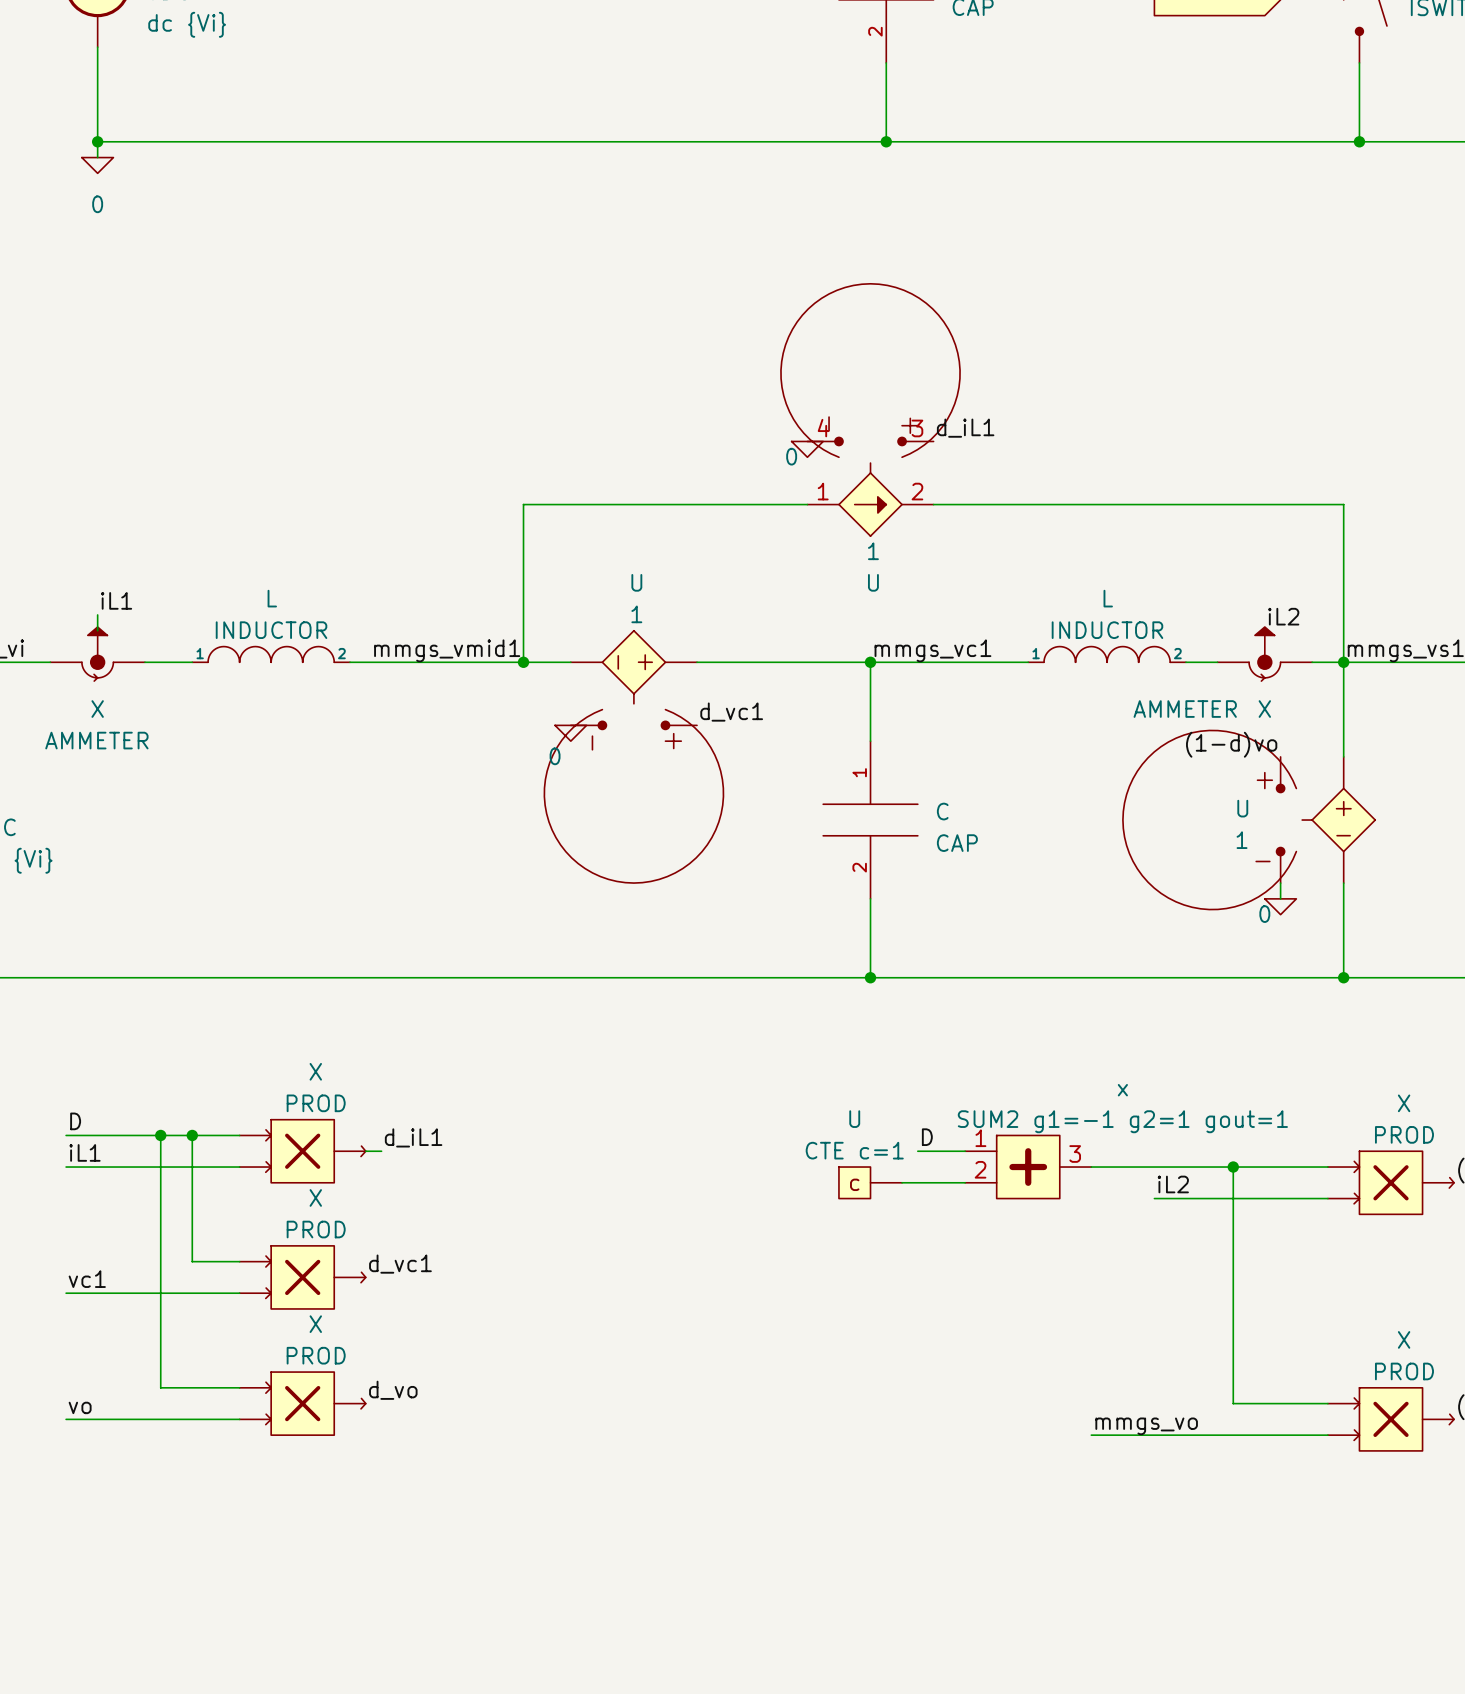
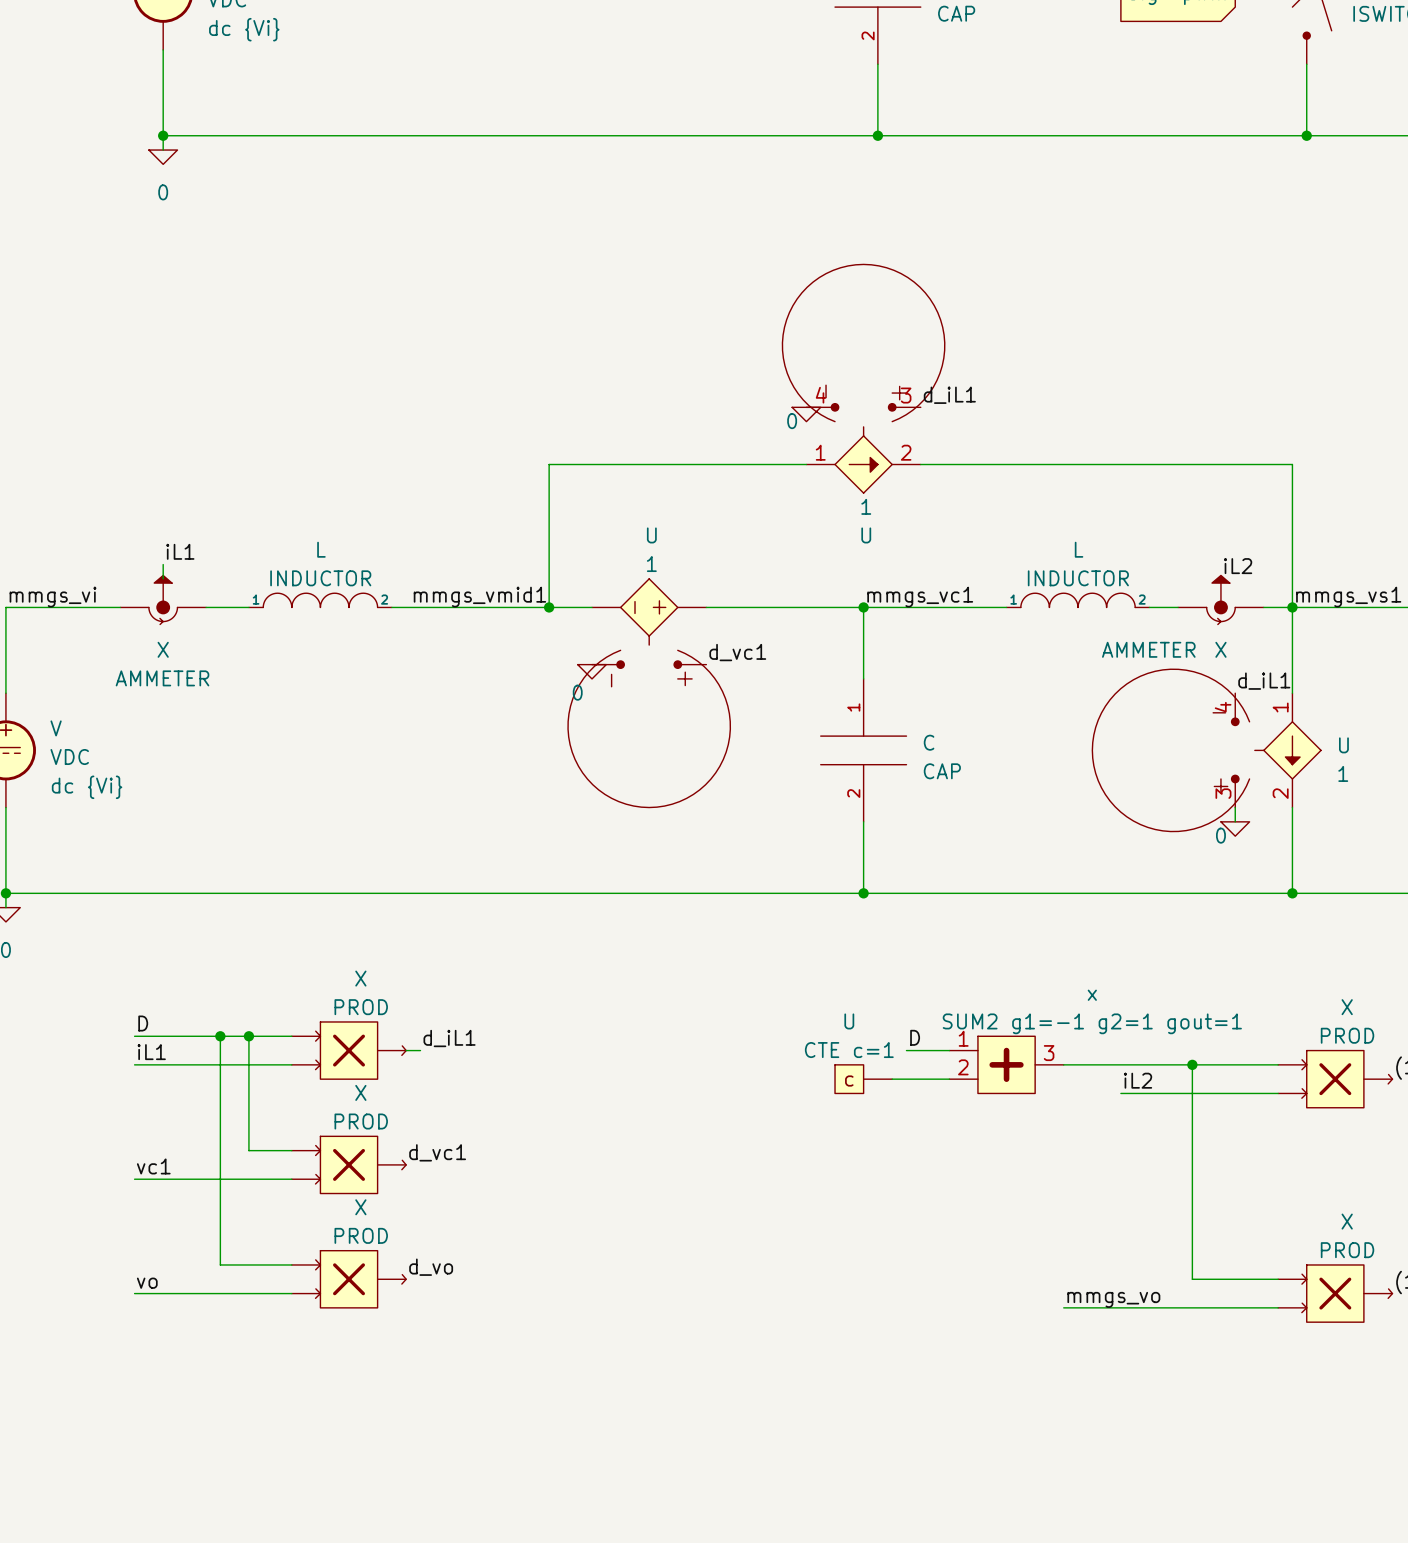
U symbol: [1122, 730, 1376, 910] -> [1092, 669, 1322, 832]
label: (1-d)vo (1231, 744) -> d_iL1 (1264, 681)
U name position: U (1242, 808) -> U (1343, 745)
U text position: 1 (1242, 840) -> 1 (1343, 773)

